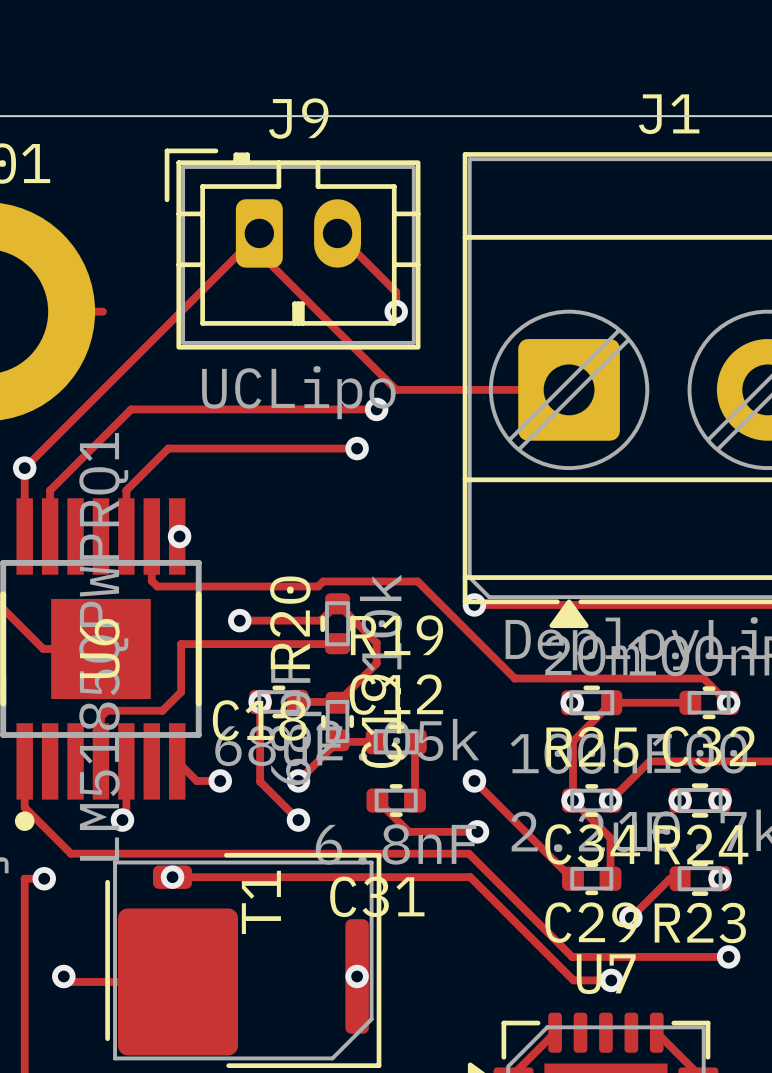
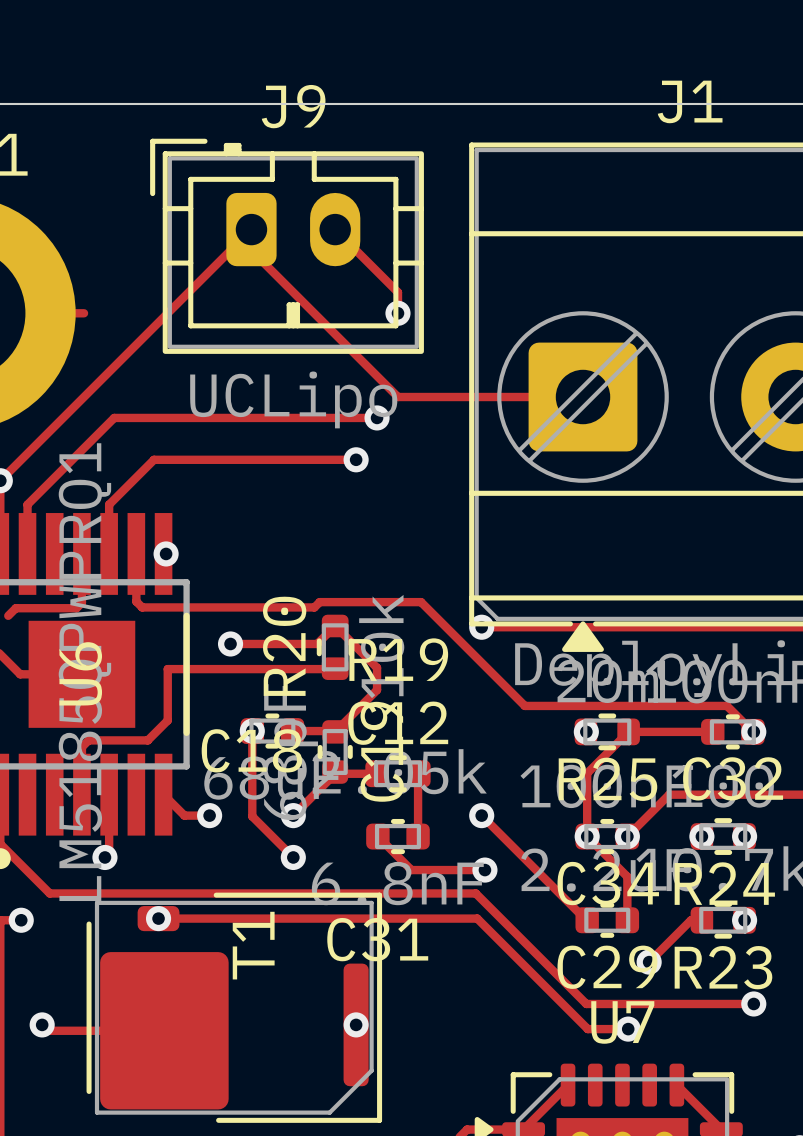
track: none -> (81, 553) (81, 602) (76, 608) (15, 608) (8, 615)

